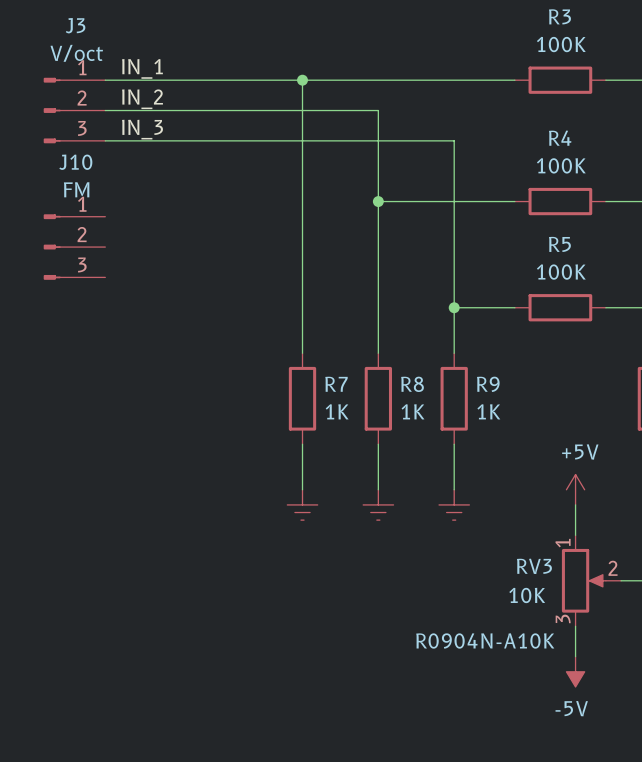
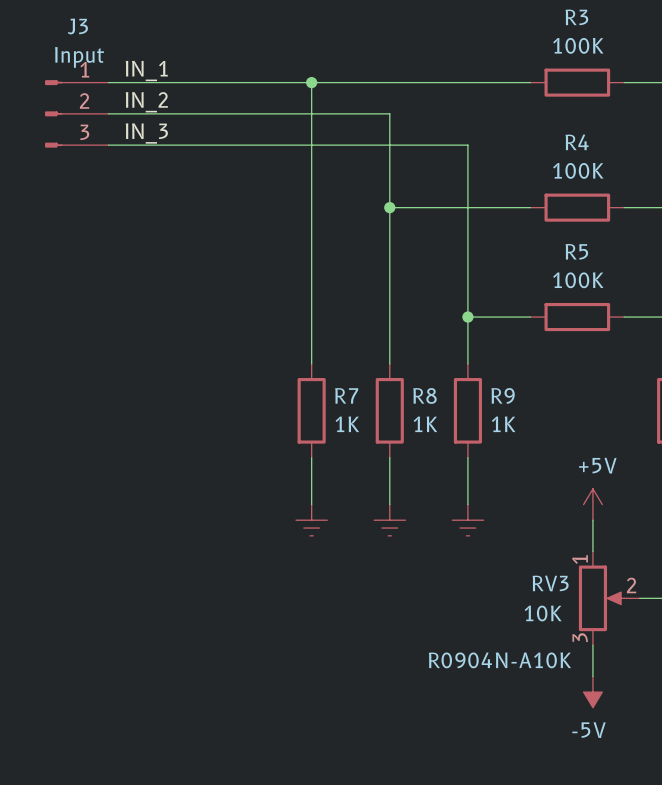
J3 value: V/oct (76, 53) -> Input (79, 57)
J10: FM (74, 247) -> none

